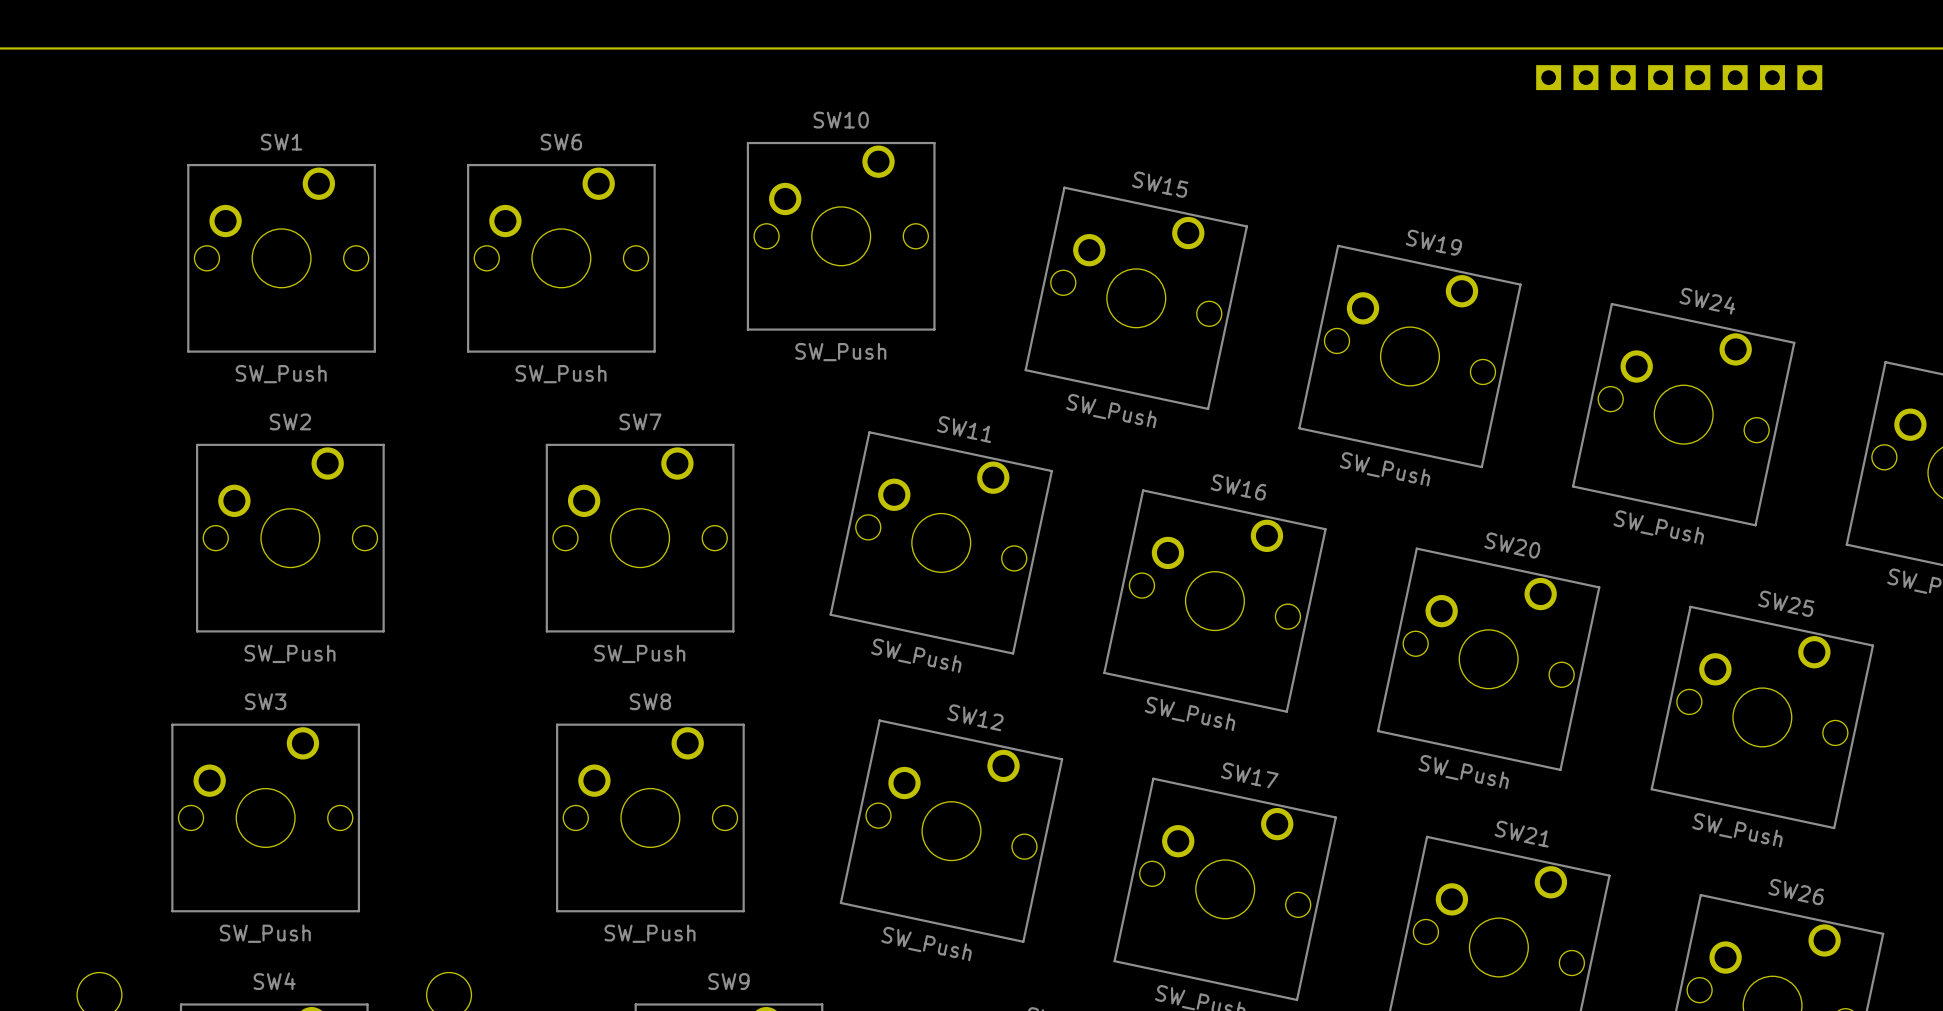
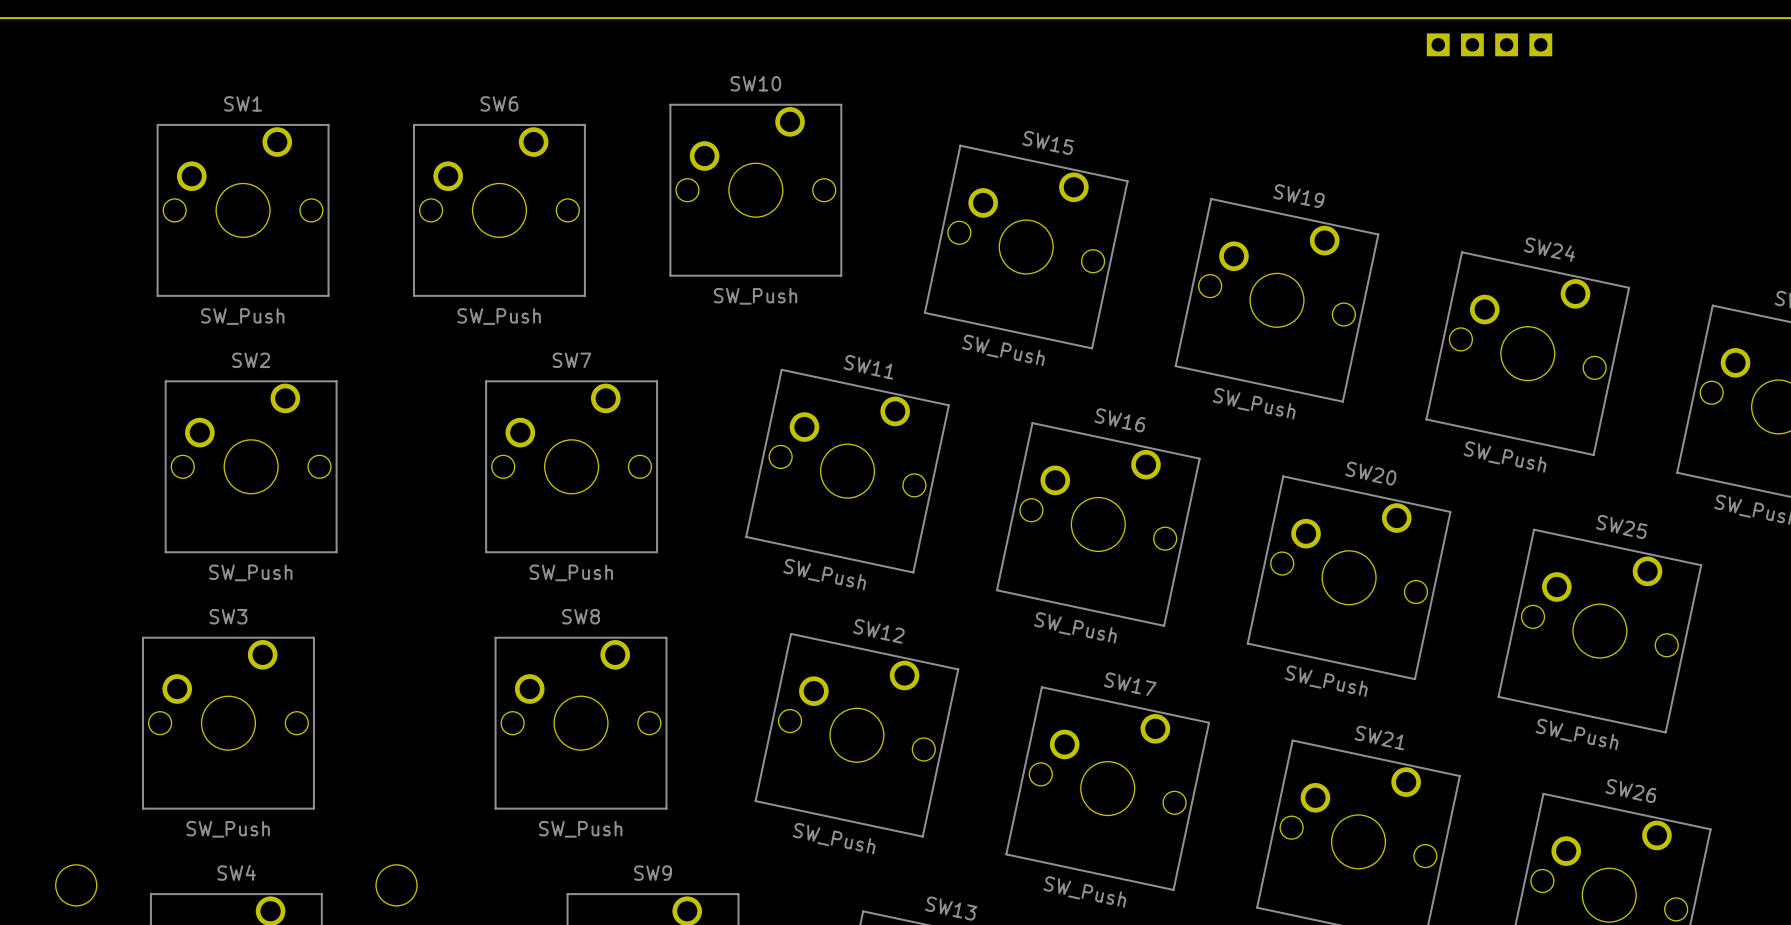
part: (1548, 77) -> none
part: (1735, 77) -> none
part: (1772, 77) -> none
part: (1809, 77) -> none

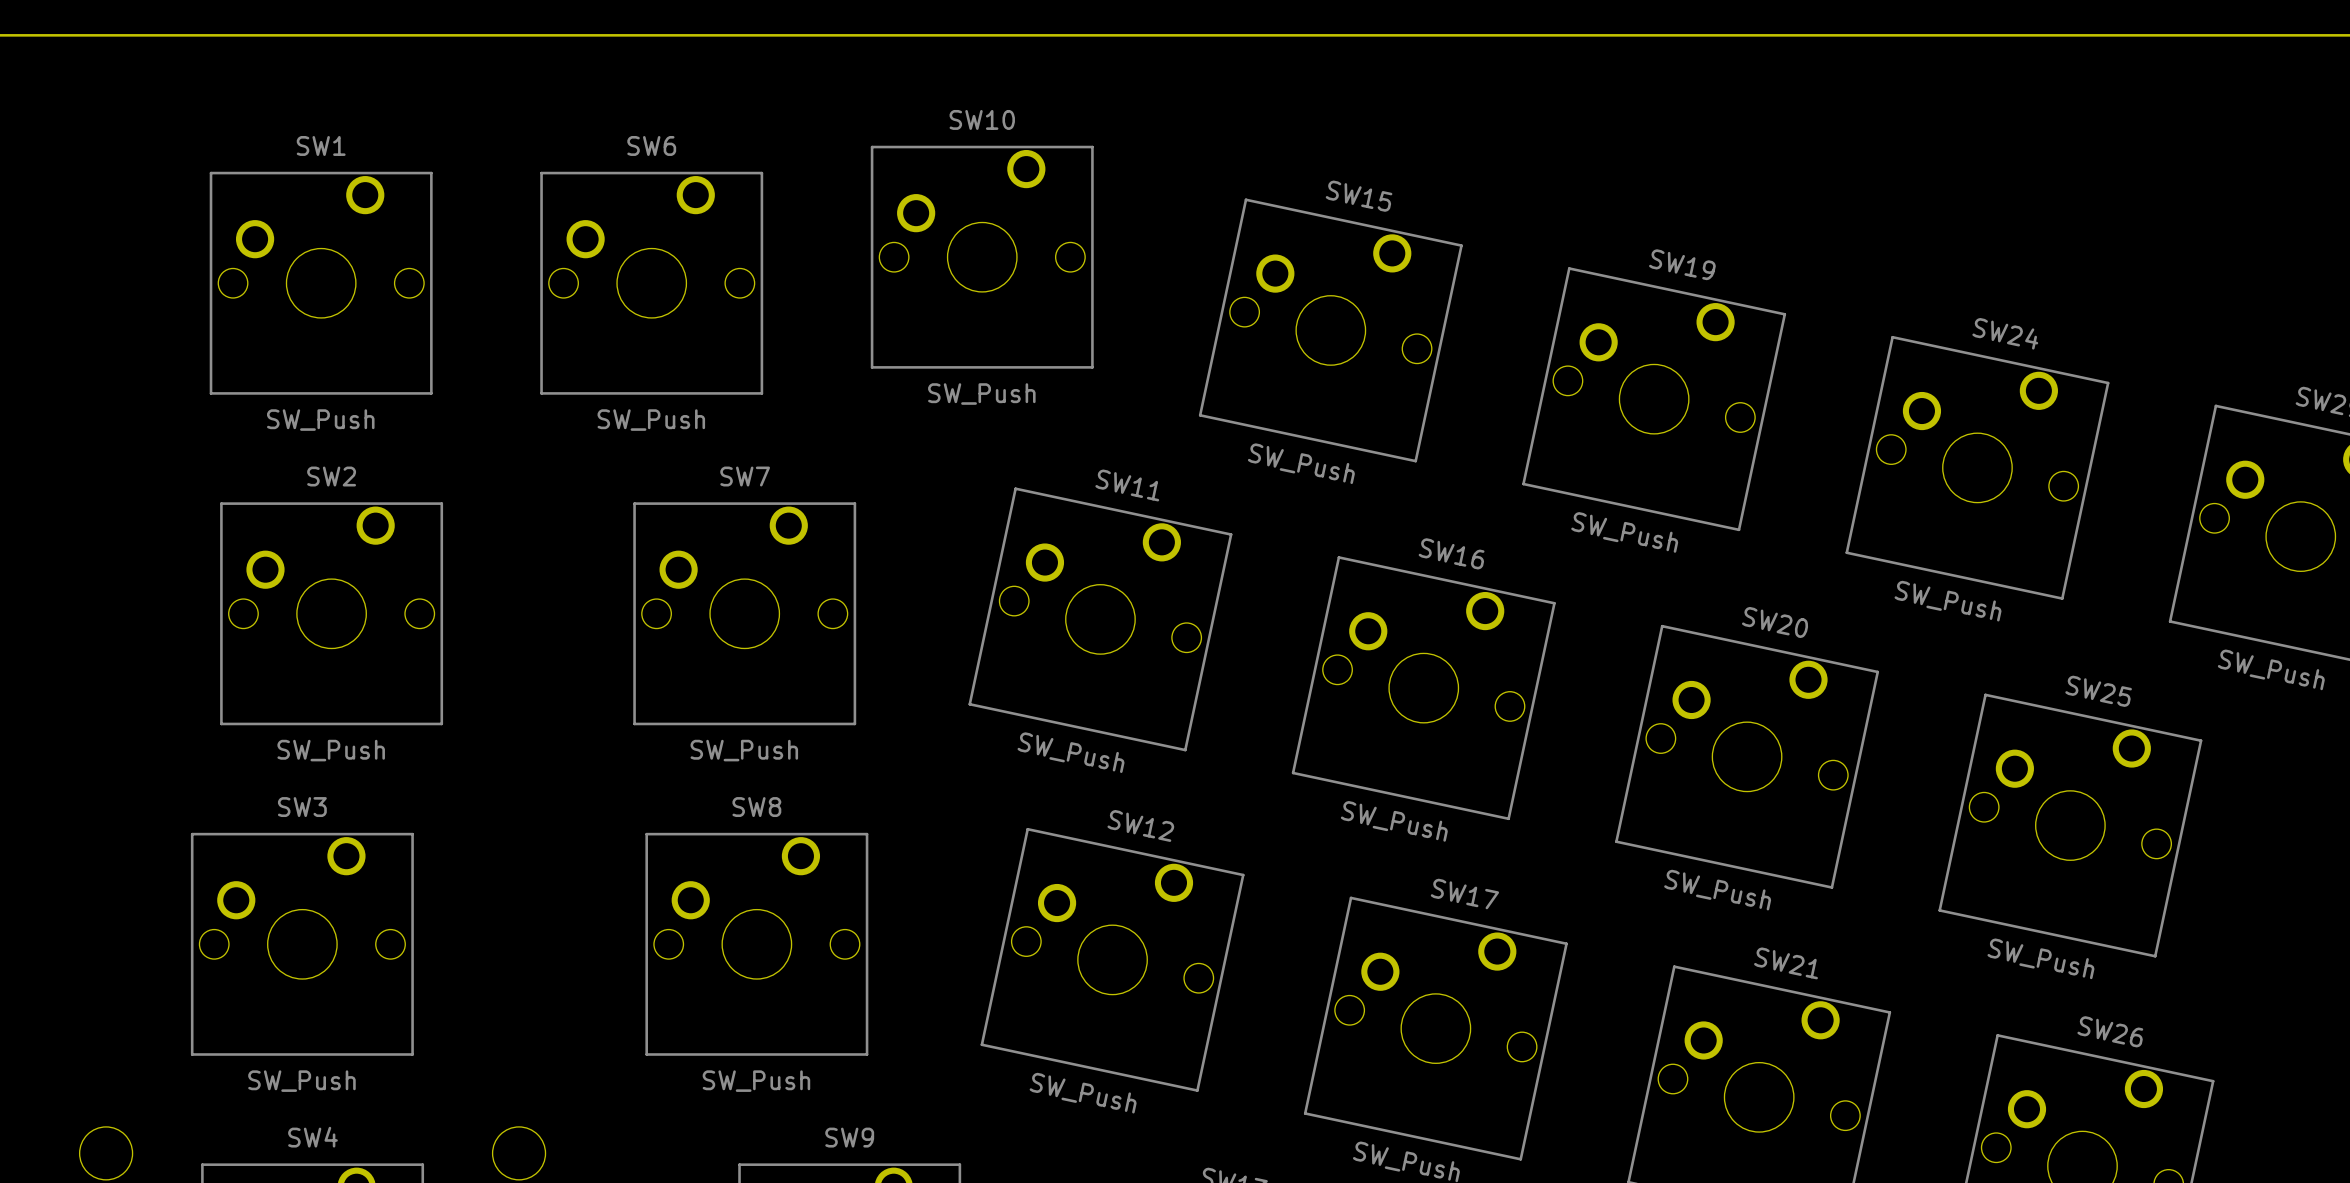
part: (1438, 44) -> none
part: (1472, 44) -> none
part: (1506, 44) -> none
part: (1540, 44) -> none

